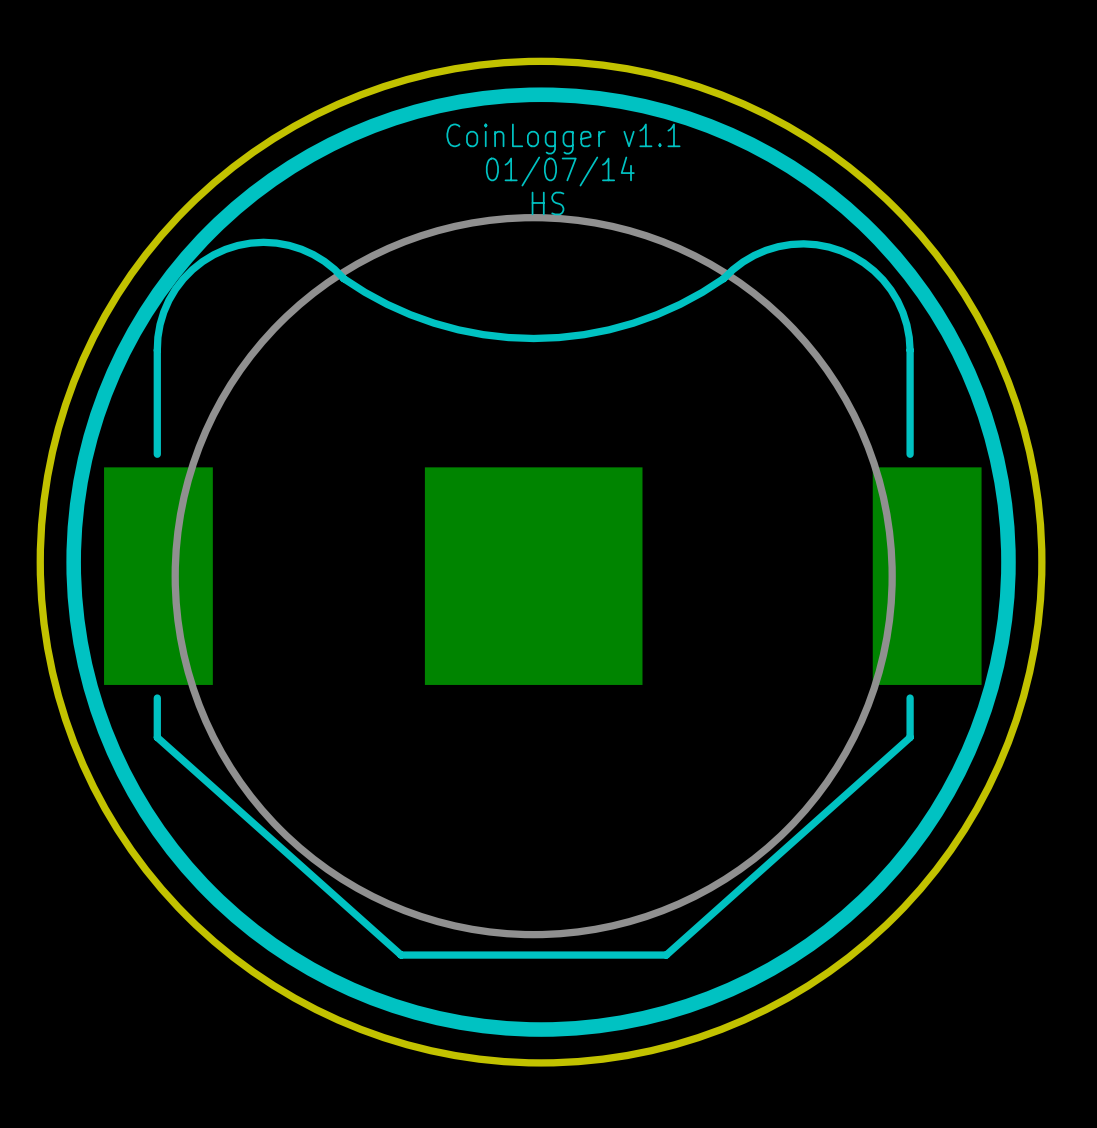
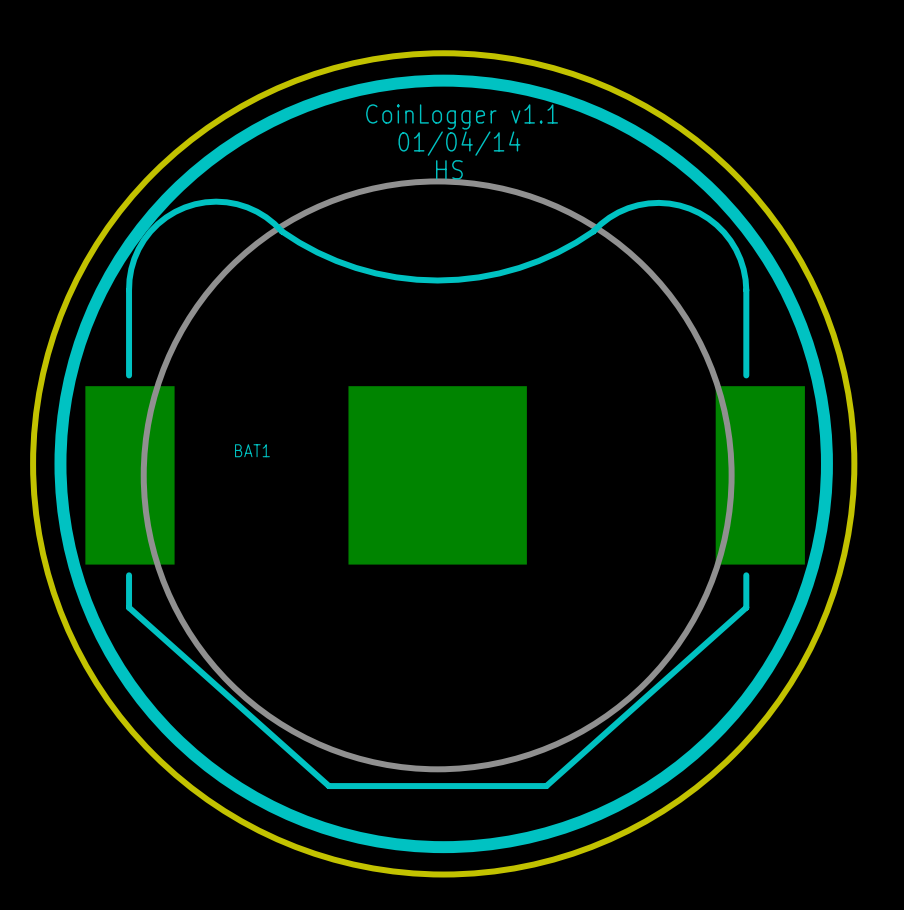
text: 01/07/14 (560, 171) -> 01/04/14 (459, 143)
BAT1 name: none -> BAT1 (252, 450)

